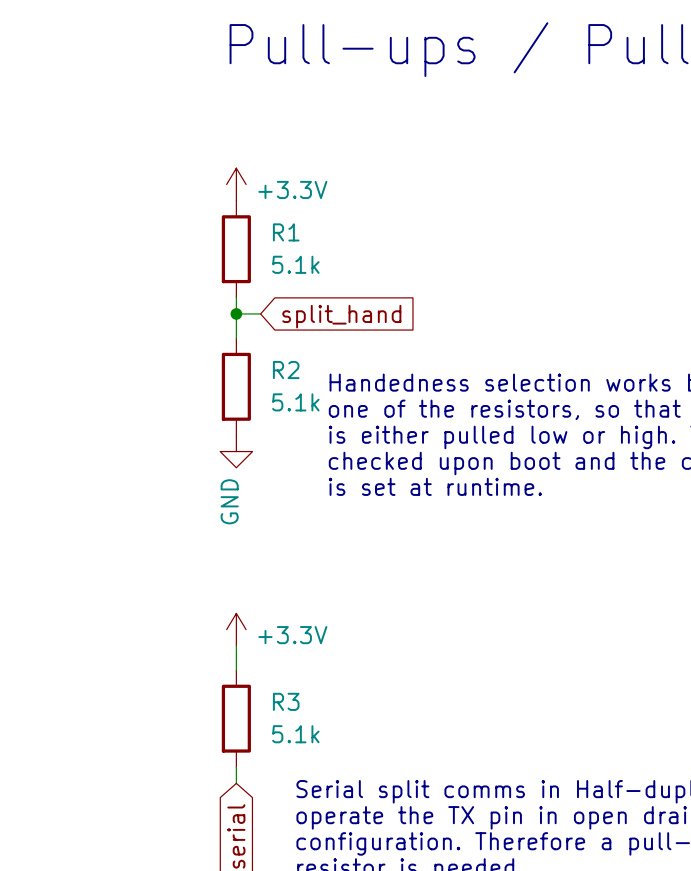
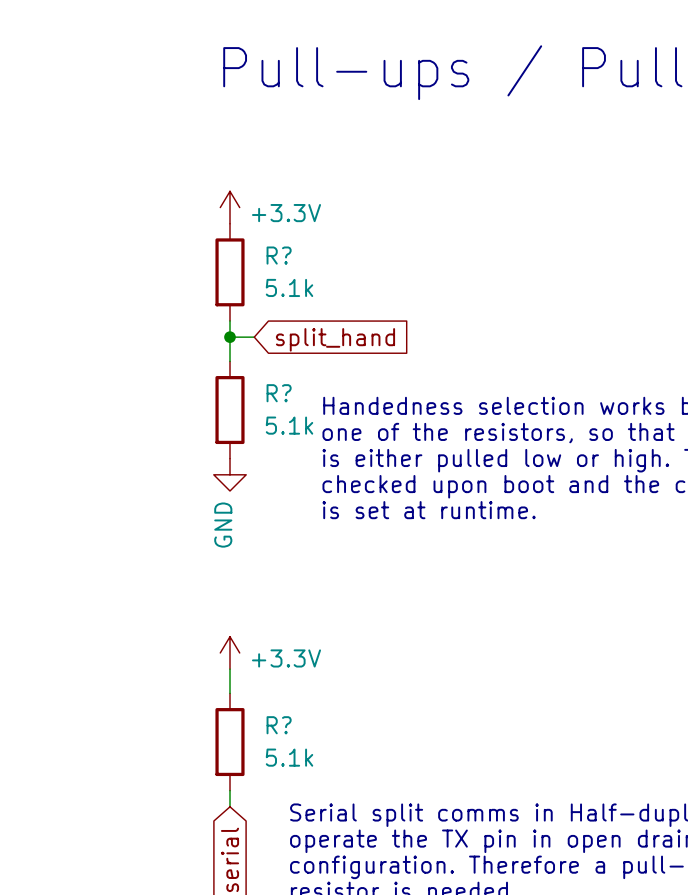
R1 name: R1 (286, 232) -> R? (279, 255)
R2 name: R2 (286, 370) -> R? (279, 393)
R3 name: R3 (286, 701) -> R? (279, 725)

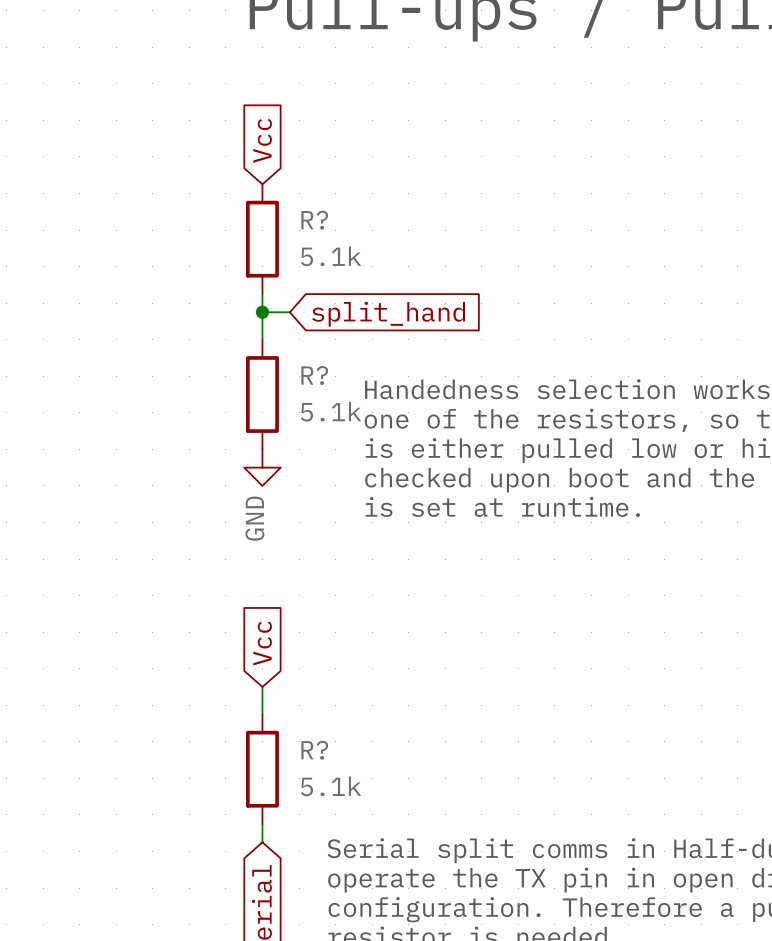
global label: none -> Vcc (262, 140)
power symbol: +3.3V (230, 207) -> none
global label: none -> Vcc (262, 643)
power symbol: +3.3V (230, 652) -> none

